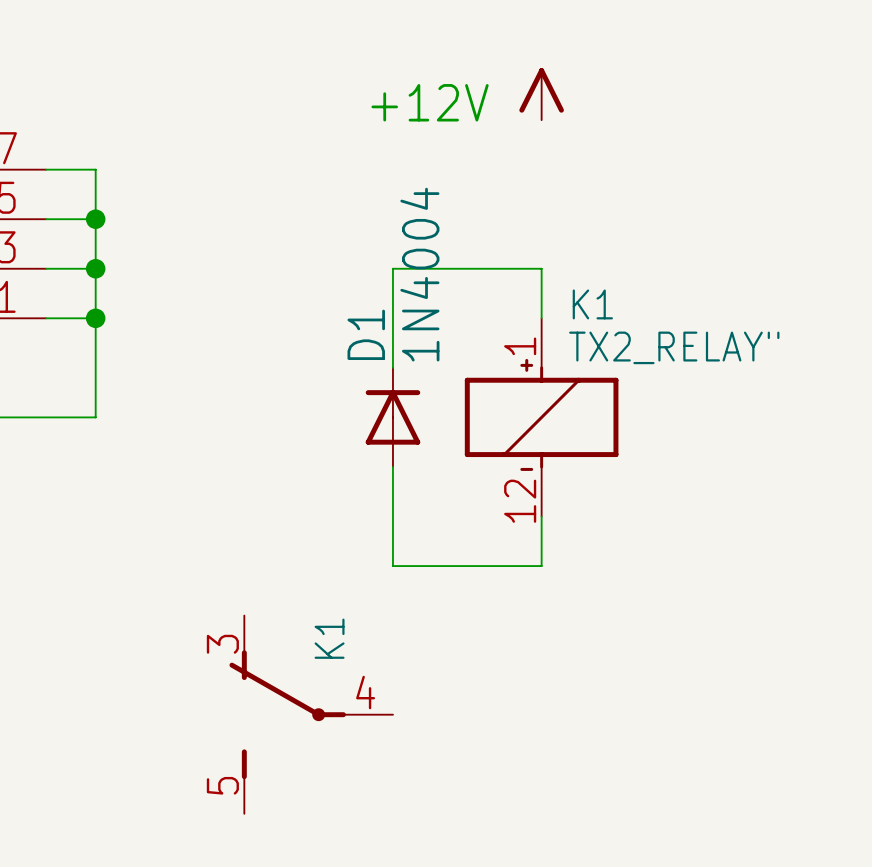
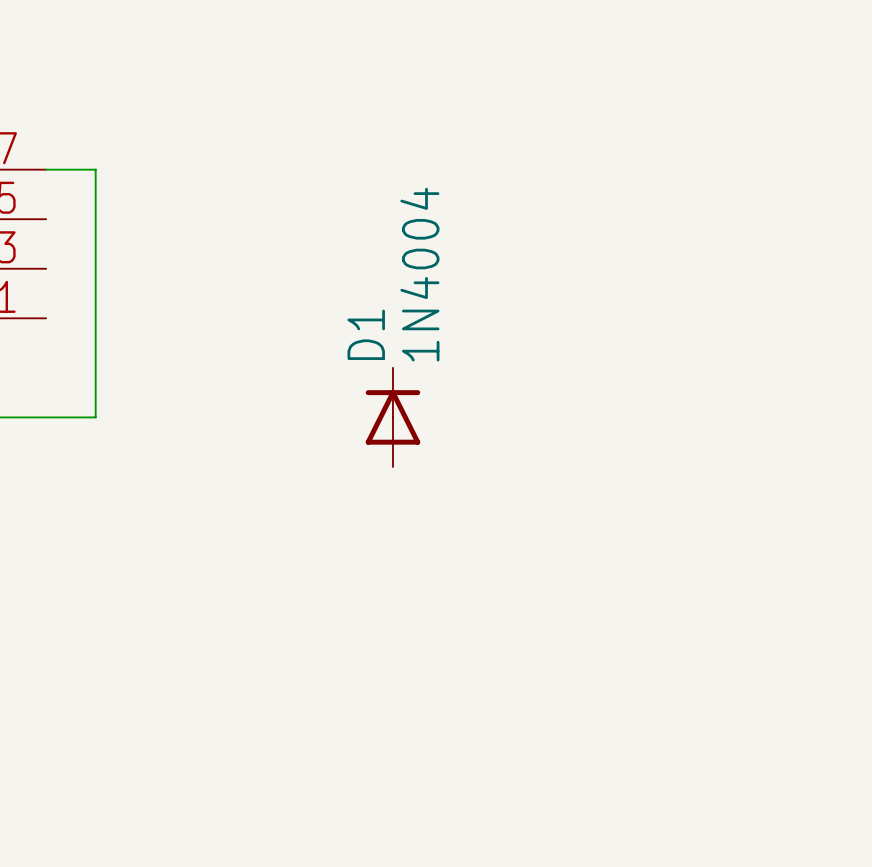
power symbol: (541, 94) -> none
text: +12V (430, 102) -> none
wire: (46, 219) (95, 219) -> none
junction: (95, 219) -> none
wire: (46, 268) (95, 268) -> none
junction: (95, 268) -> none
wire: (46, 318) (95, 318) -> none
junction: (95, 318) -> none
wire: (541, 318) (541, 268) (392, 268) (392, 367) -> none
K1: TX2_RELAY" (541, 417) -> none
wire: (392, 466) (392, 566) (541, 566) (541, 516) -> none
K1: (311, 714) -> none

